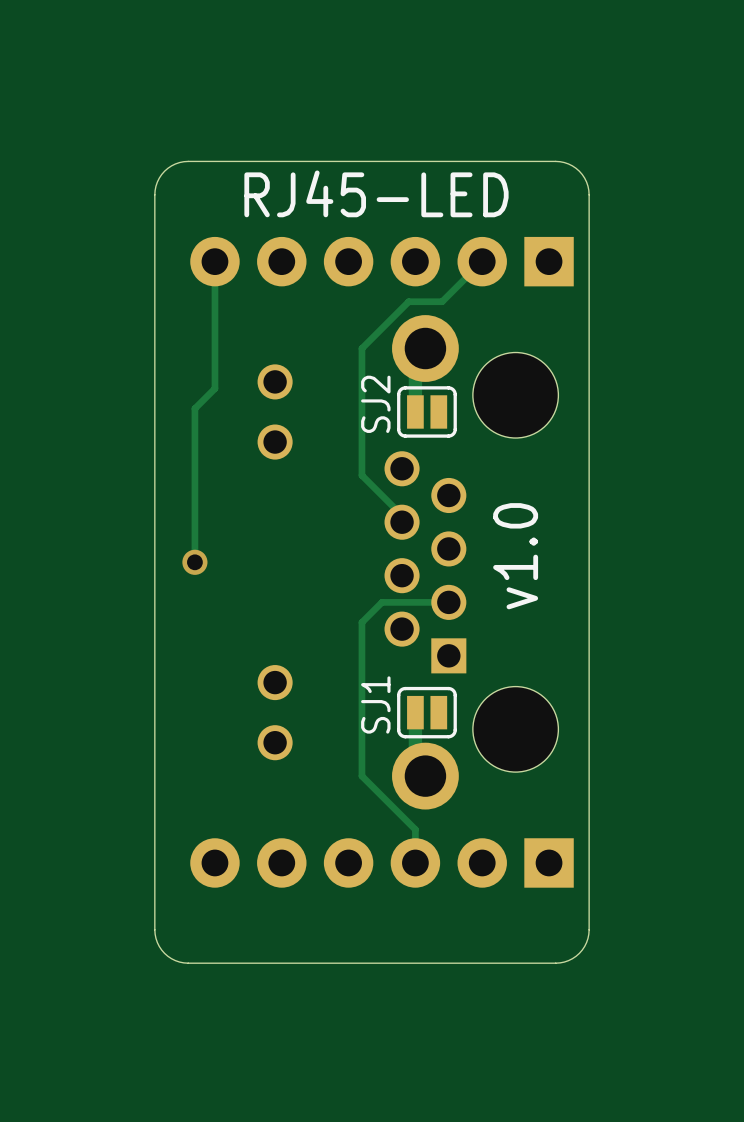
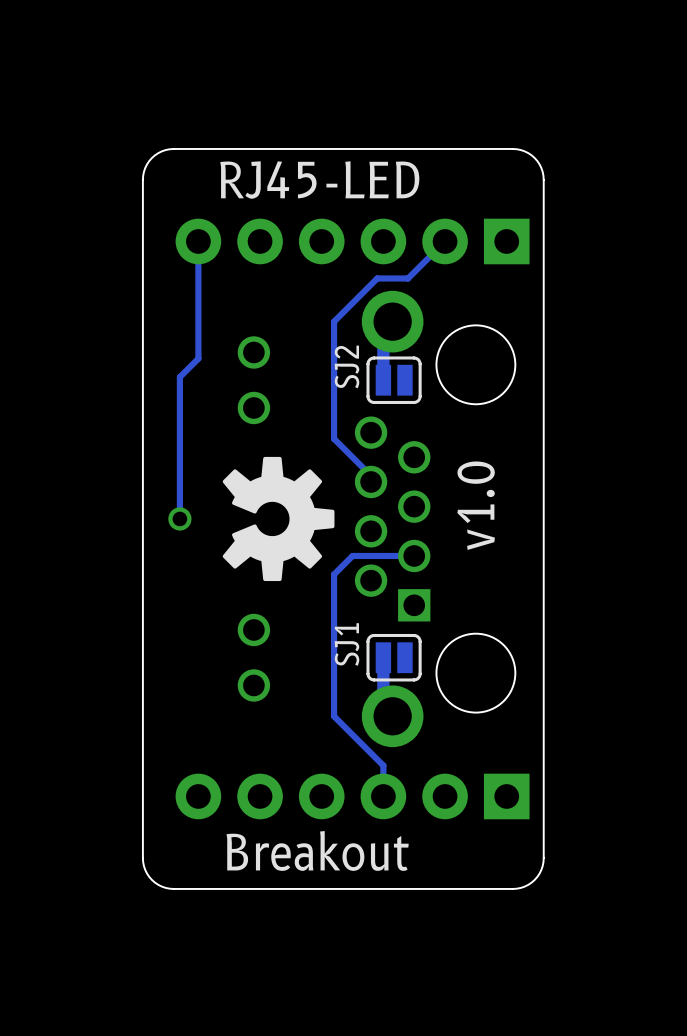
drawing: none -> [222, 456, 335, 582]
text: none -> Breakout (317, 850)

